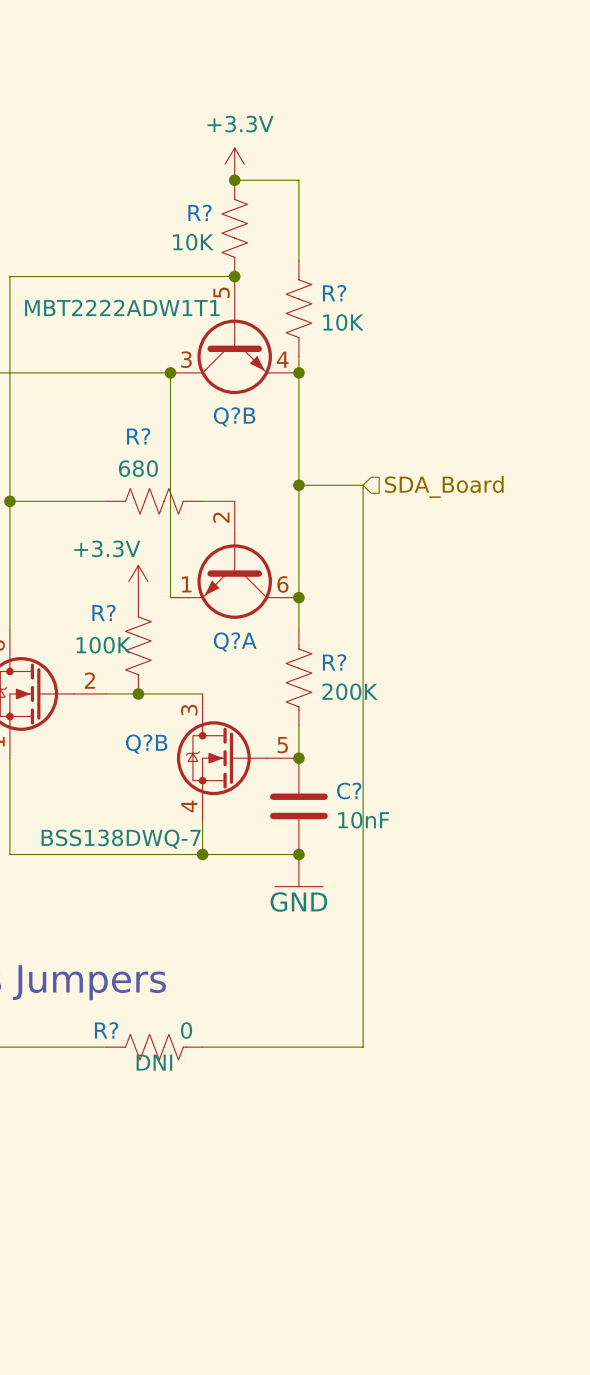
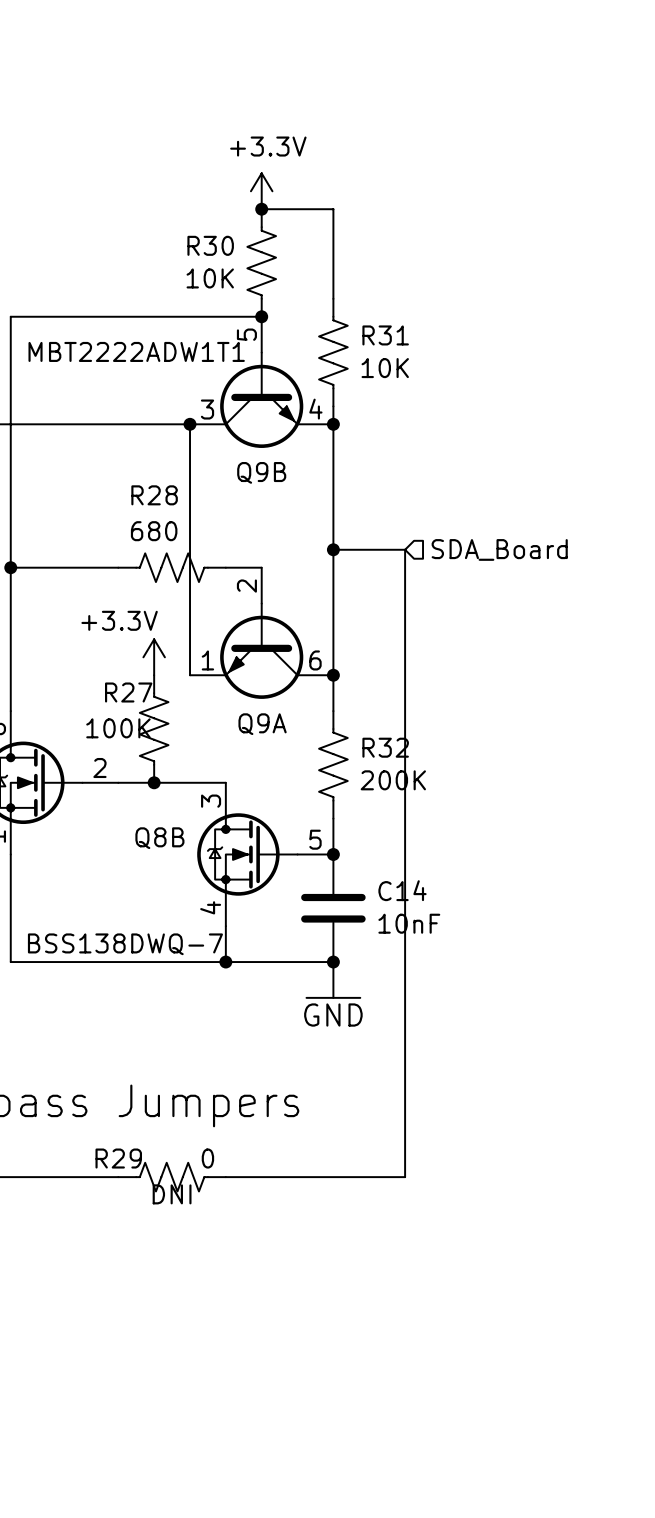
R? name: R? (200, 212) -> R30 (210, 245)
R? name: R? (334, 293) -> R31 (385, 335)
Q?B name: Q?B (234, 416) -> Q9B (261, 472)
R? name: R? (138, 436) -> R28 (154, 495)
R? name: R? (104, 612) -> R27 (128, 692)
Q?A name: Q?A (235, 641) -> Q9A (262, 724)
R? name: R? (334, 662) -> R32 (385, 747)
Q?B name: Q?B (146, 744) -> Q8B (159, 838)
C? name: C? (349, 791) -> C14 (402, 890)
R? name: R? (106, 1030) -> R29 (118, 1158)

